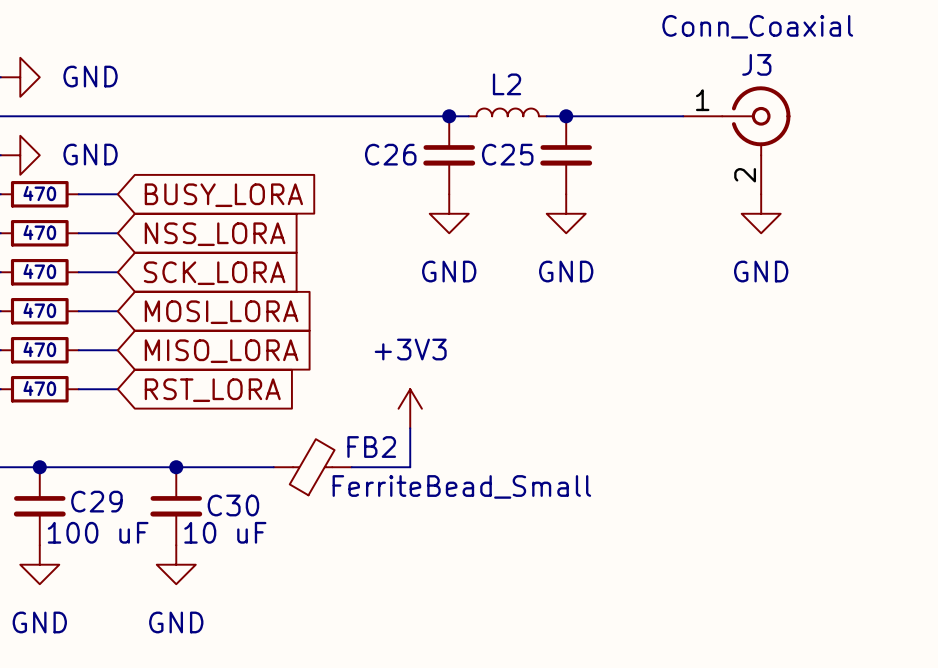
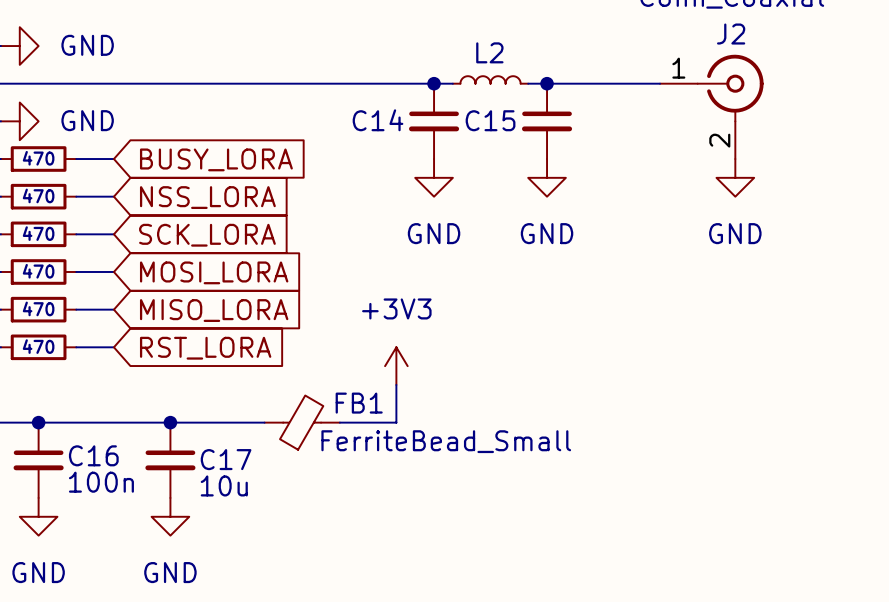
J3 name: J3 (756, 64) -> J2 (731, 34)
C26 name: C26 (390, 154) -> C14 (378, 120)
C25 name: C25 (507, 154) -> C15 (490, 120)
FB2 name: FB2 (371, 447) -> FB1 (359, 403)
C29 name: C29 (96, 501) -> C16 (93, 455)
C30 name: C30 (233, 505) -> C17 (226, 459)
C29 value: 100 uF (98, 532) -> 100n (101, 482)
C30 value: 10 uF (225, 532) -> 10u (224, 485)

